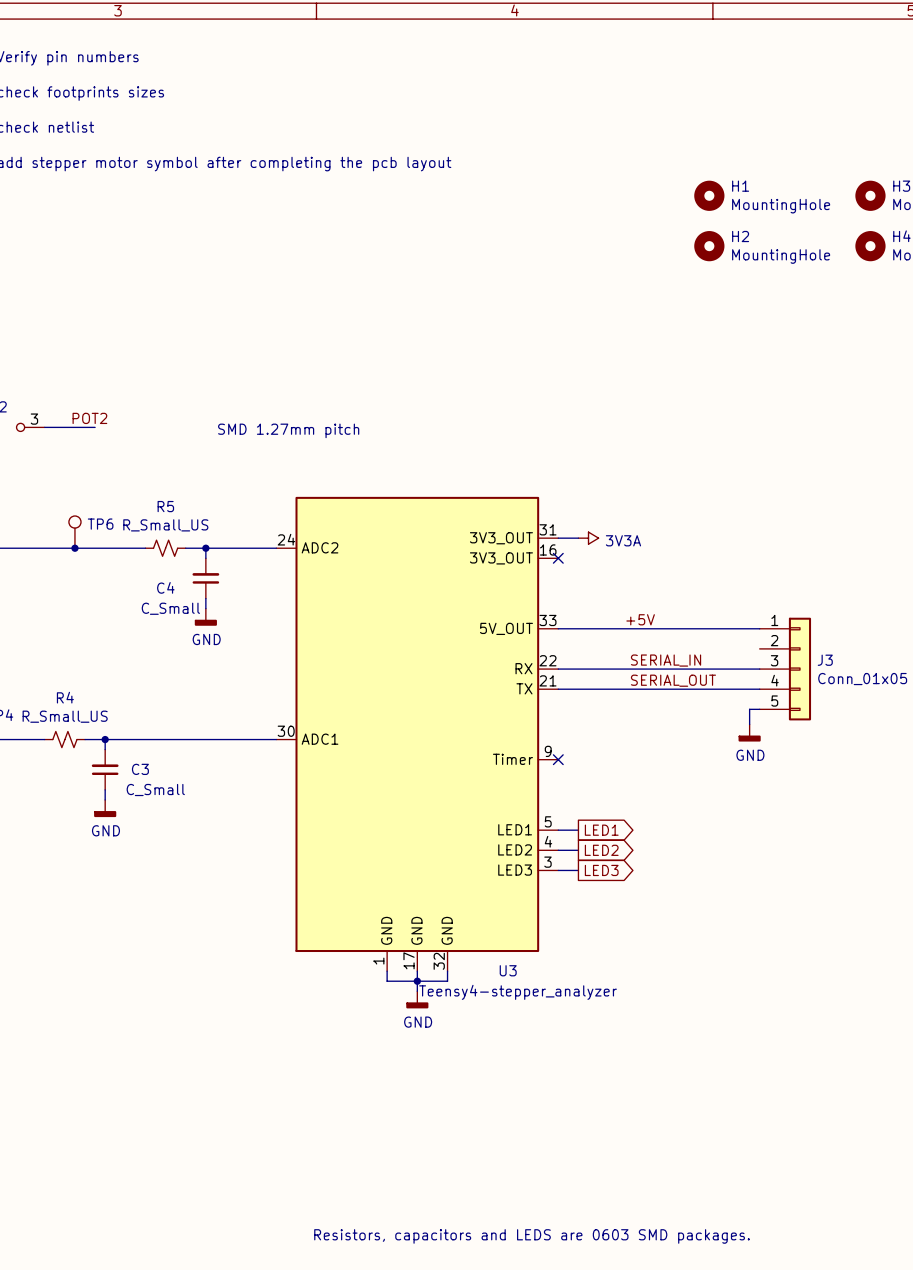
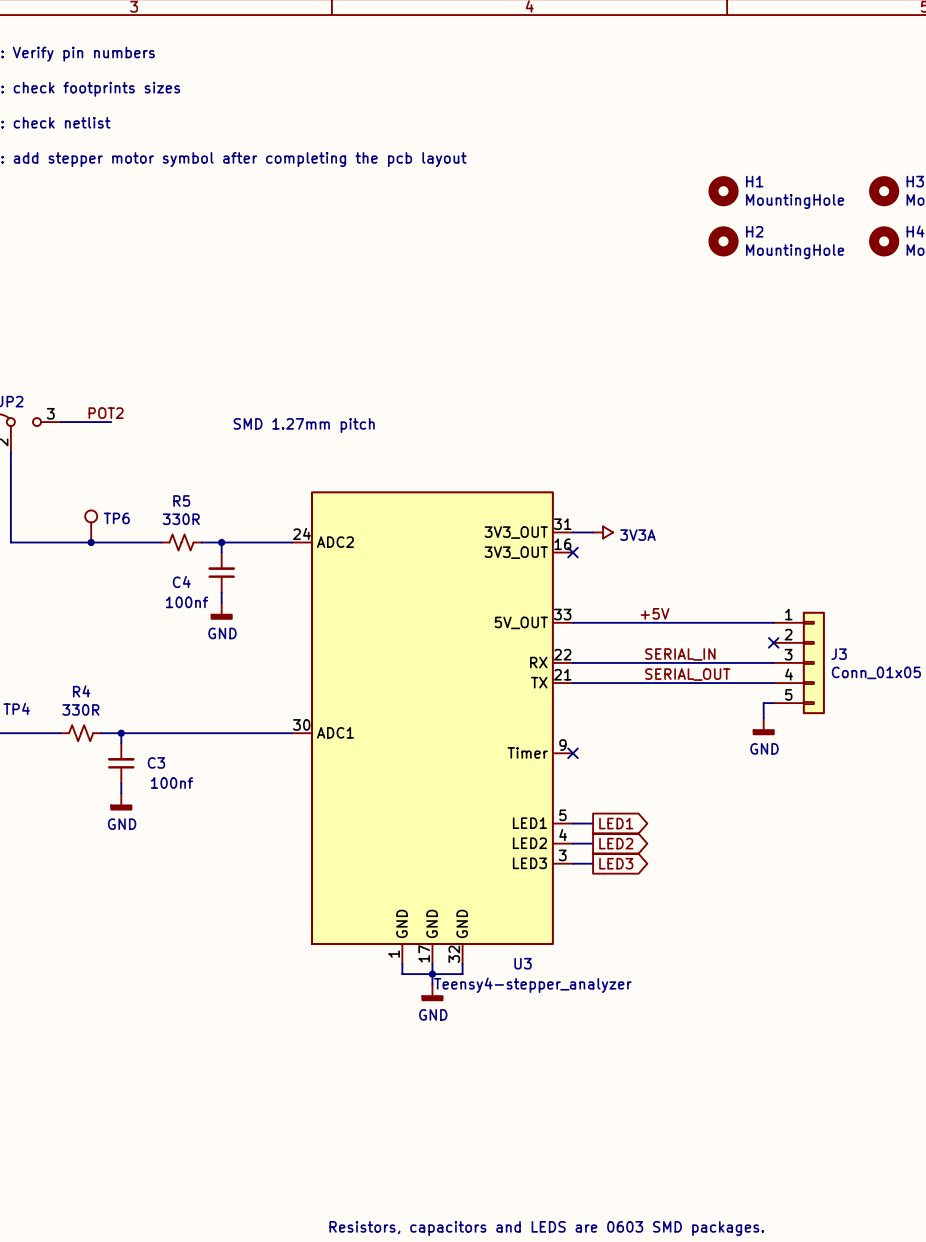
R5 value: R_Small_US (165, 525) -> 330R (181, 519)
C4 value: C_Small (170, 608) -> 100nf (187, 602)
no-connect mark: none -> (773, 642)
R4 value: R_Small_US (65, 716) -> 330R (80, 709)
C3 value: C_Small (155, 790) -> 100nf (171, 783)

